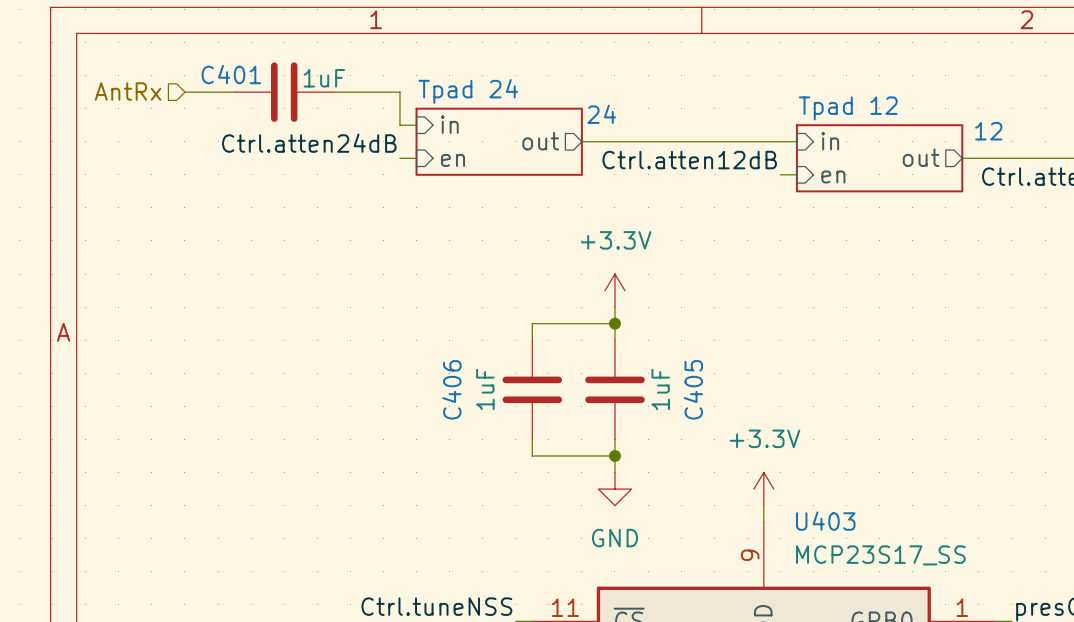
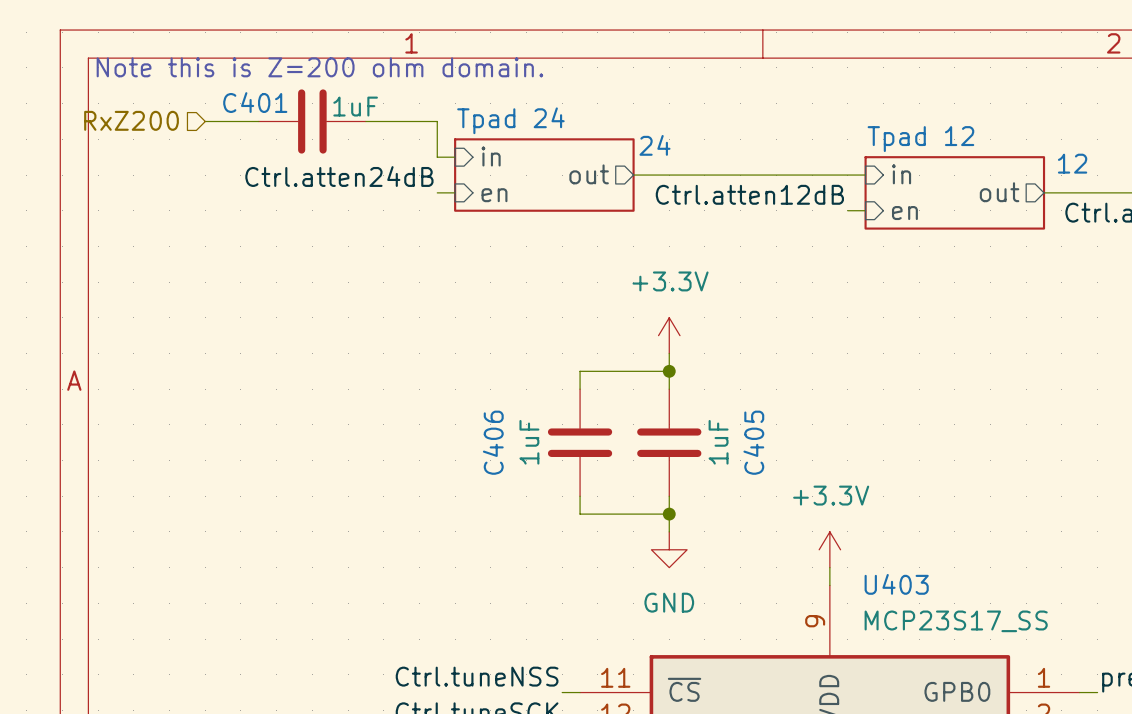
text: none -> Note this is Z=200 ohm domain. (319, 67)
hierarchical label: AntRx (128, 91) -> RxZ200 (131, 120)

